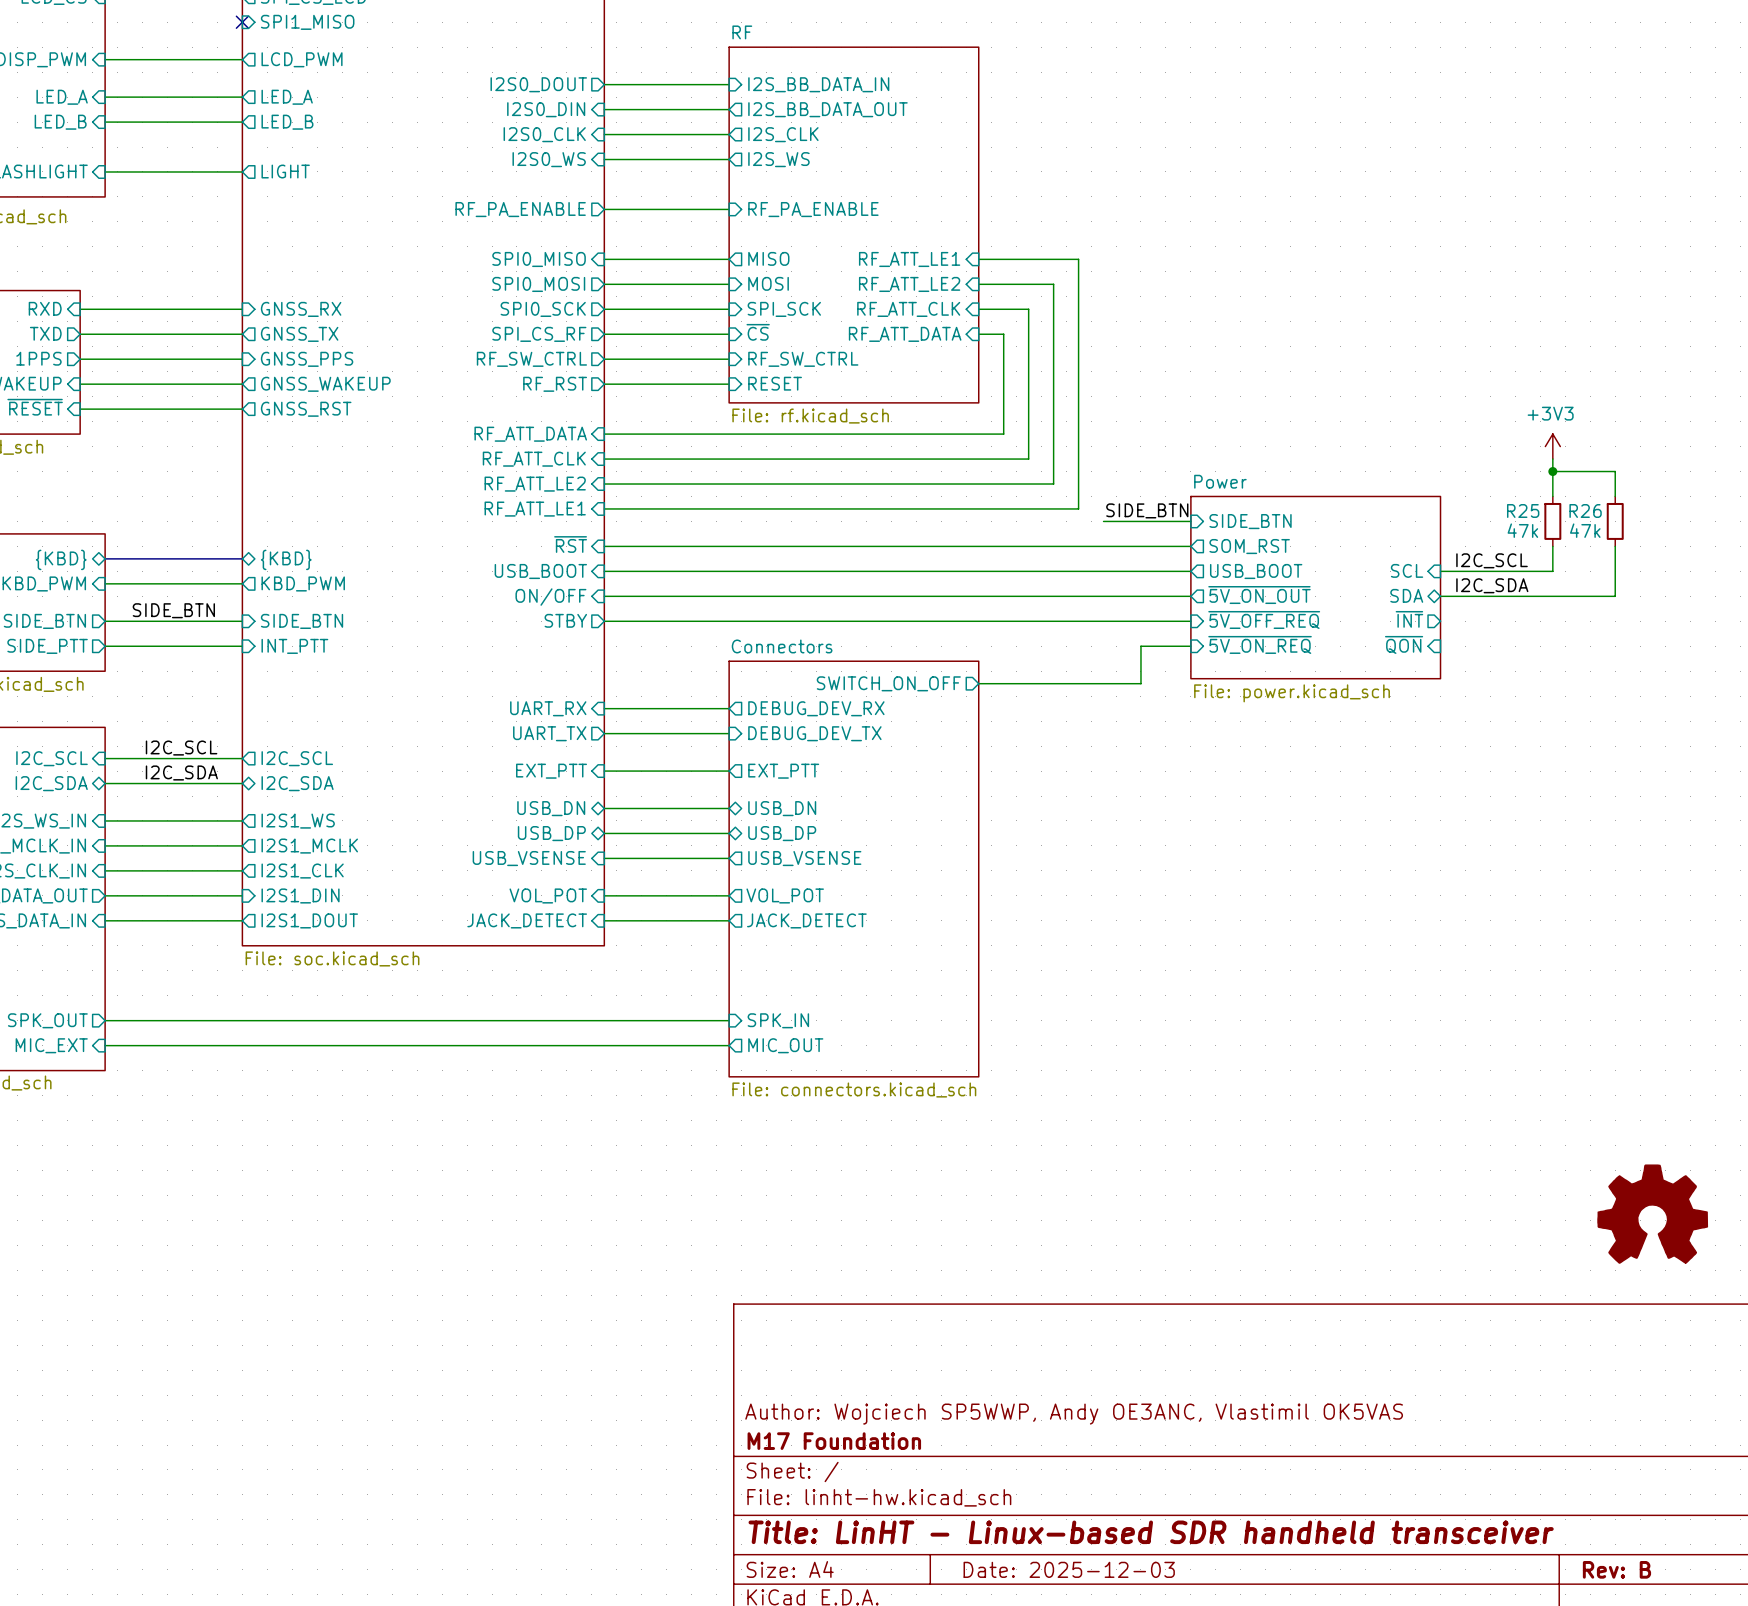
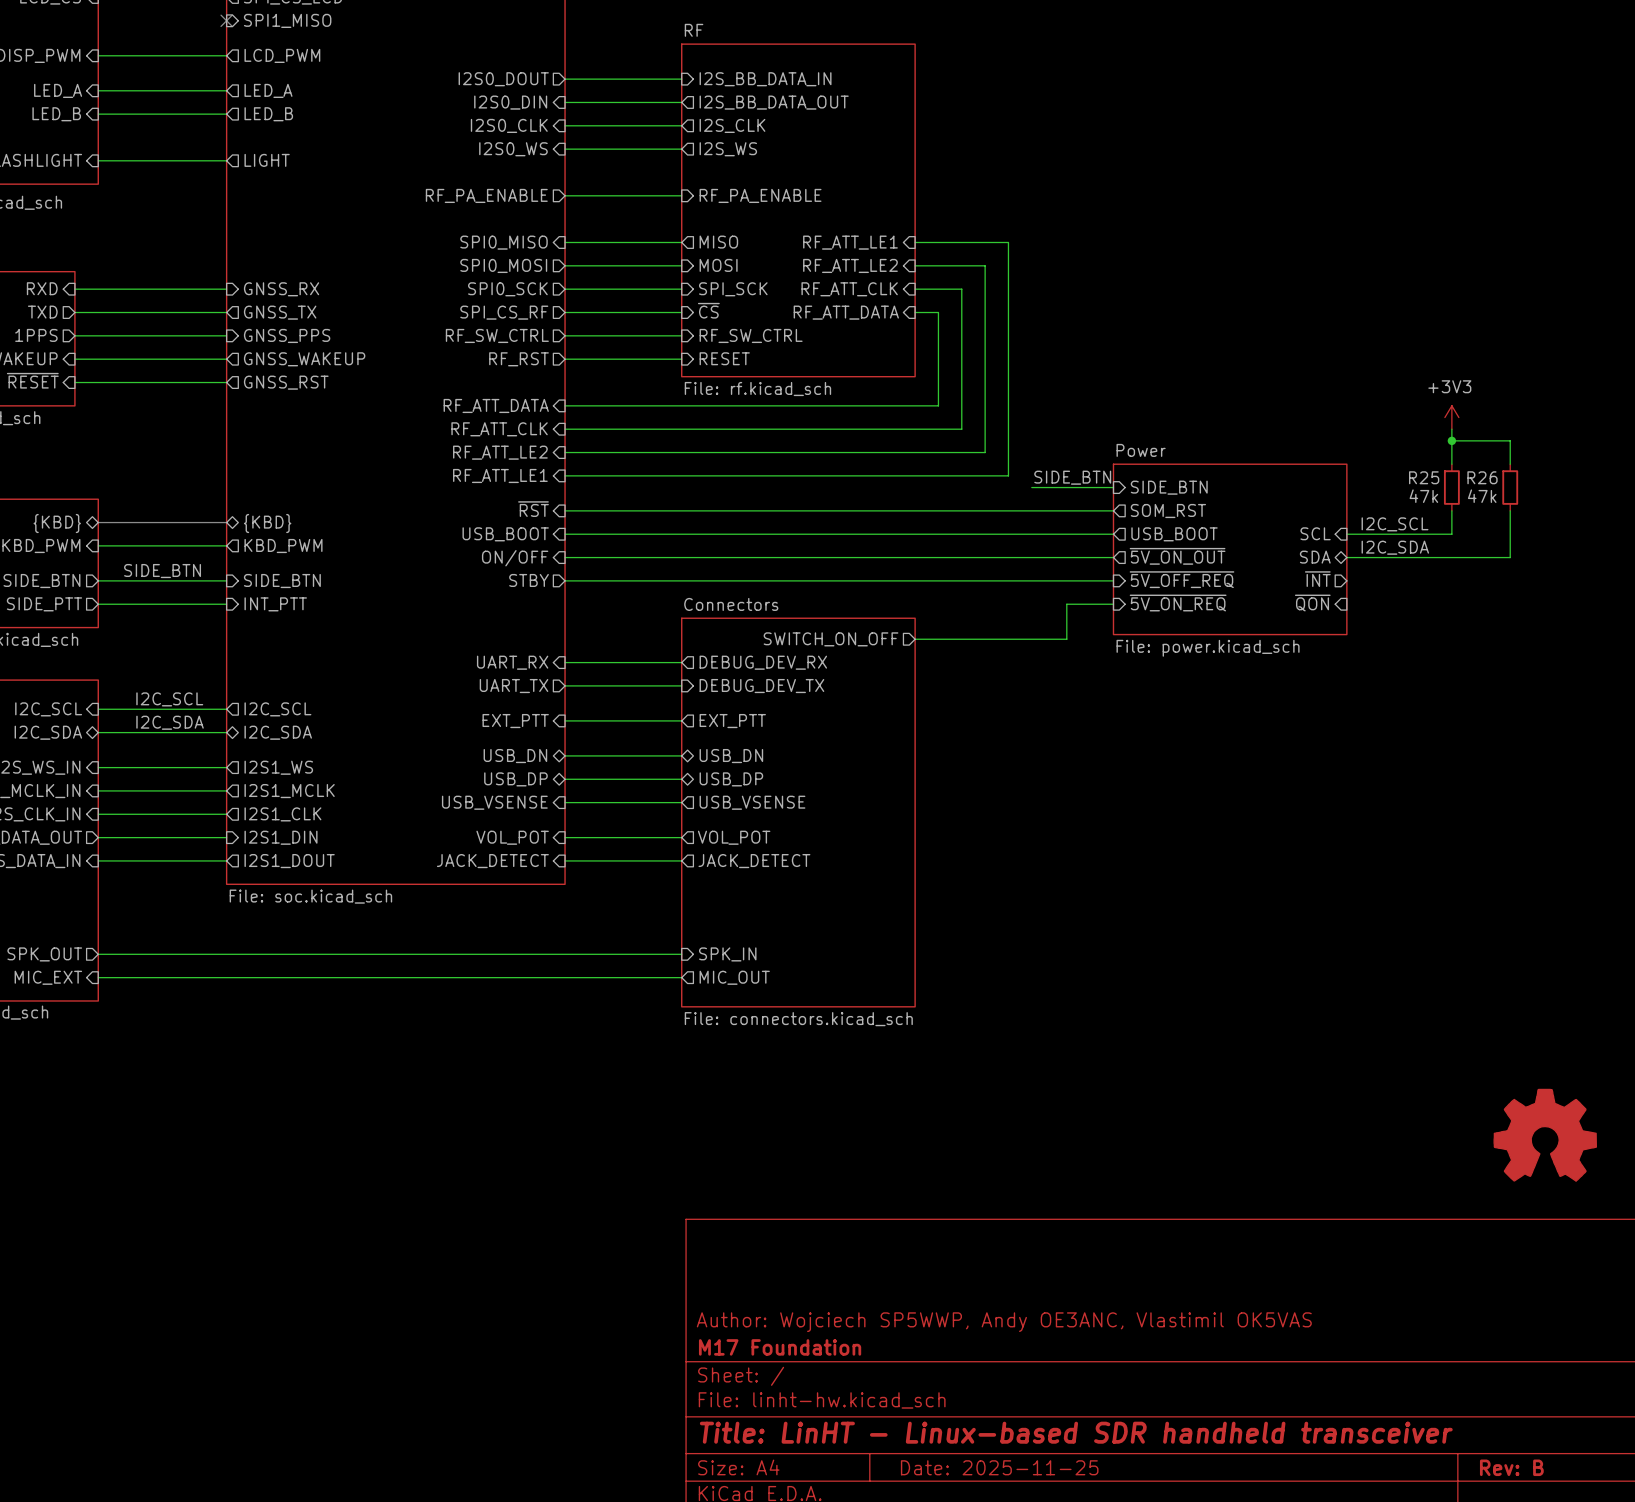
title block: Date: 2025-12-03 (1069, 1569) -> Date: 2025-11-25 (999, 1467)

